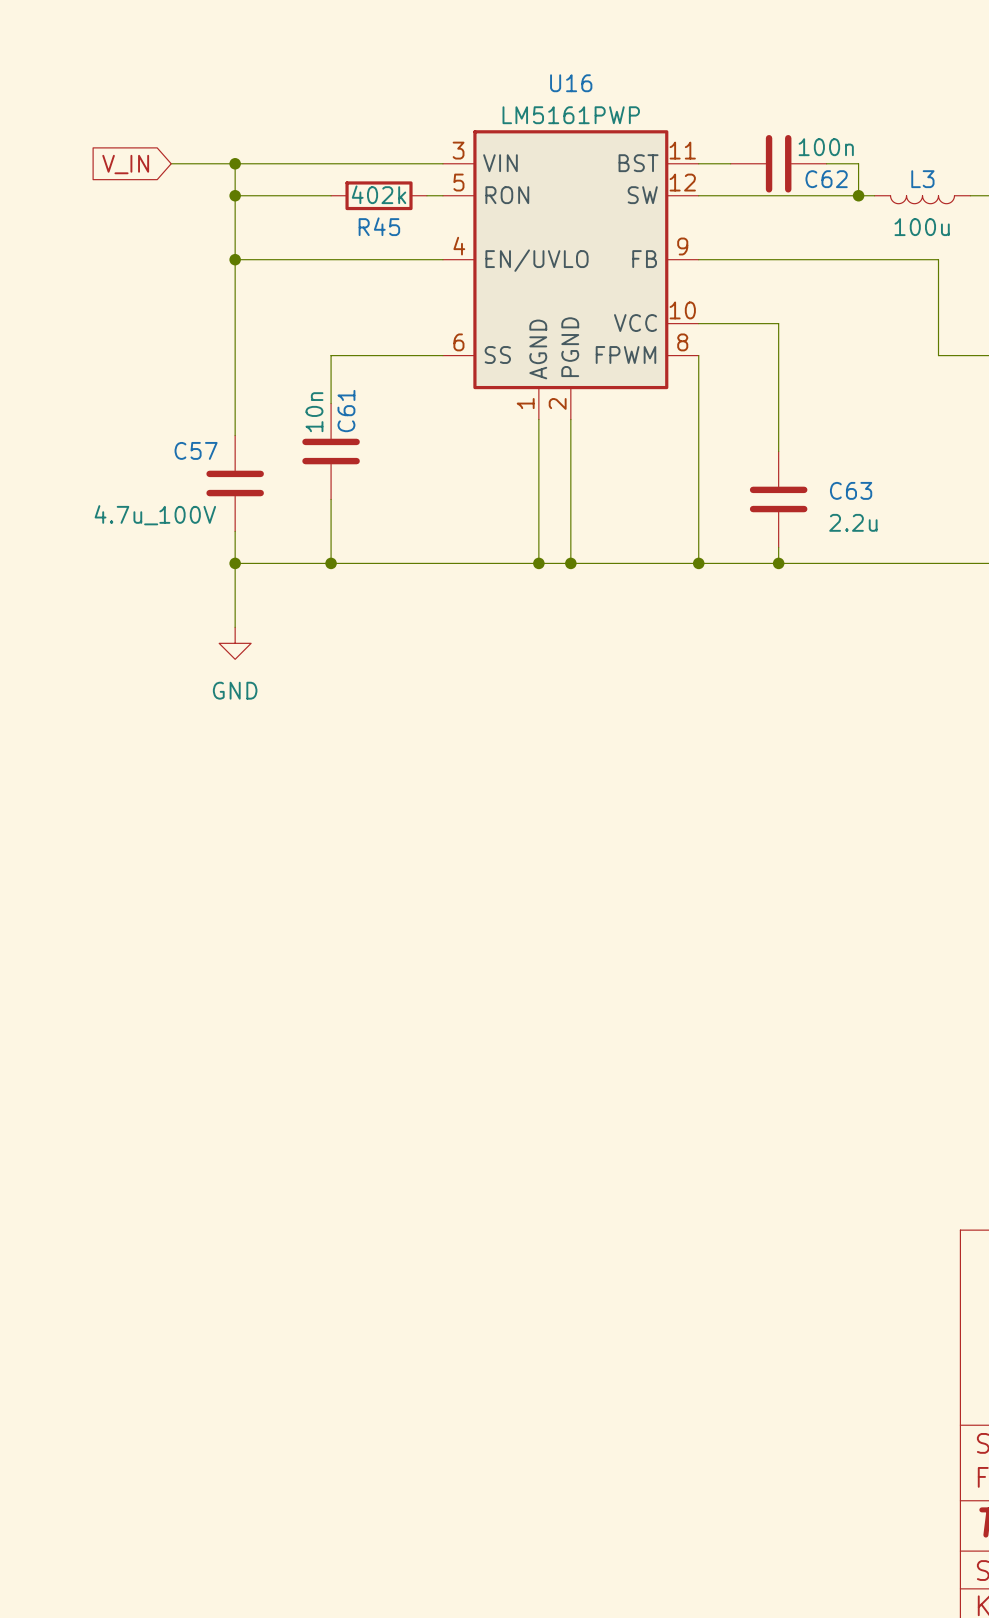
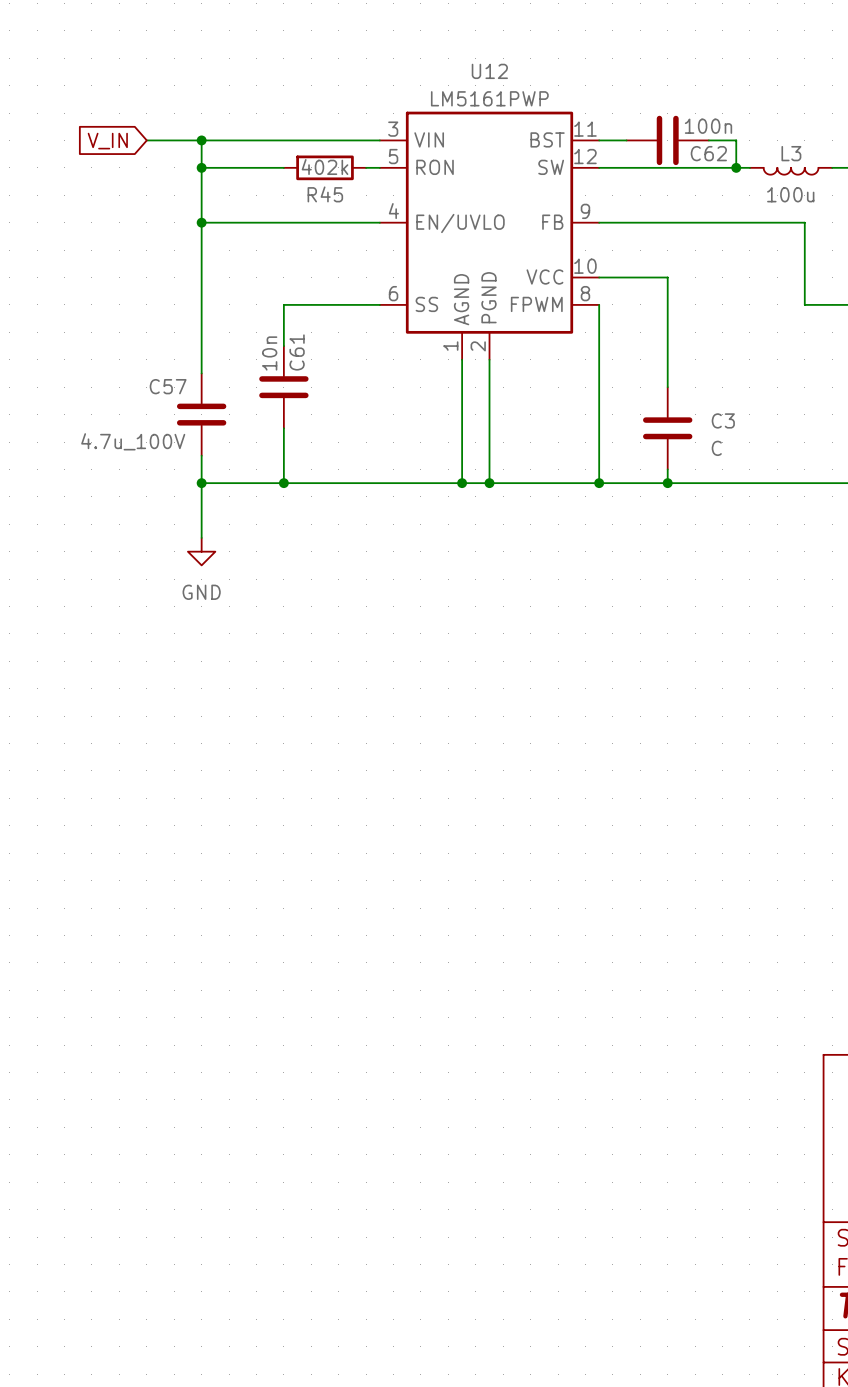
U16 name: U16 (571, 83) -> U12 (489, 71)
C63 name: C63 (851, 490) -> C3 (723, 420)
C63 value: 2.2u (853, 522) -> C (716, 448)

